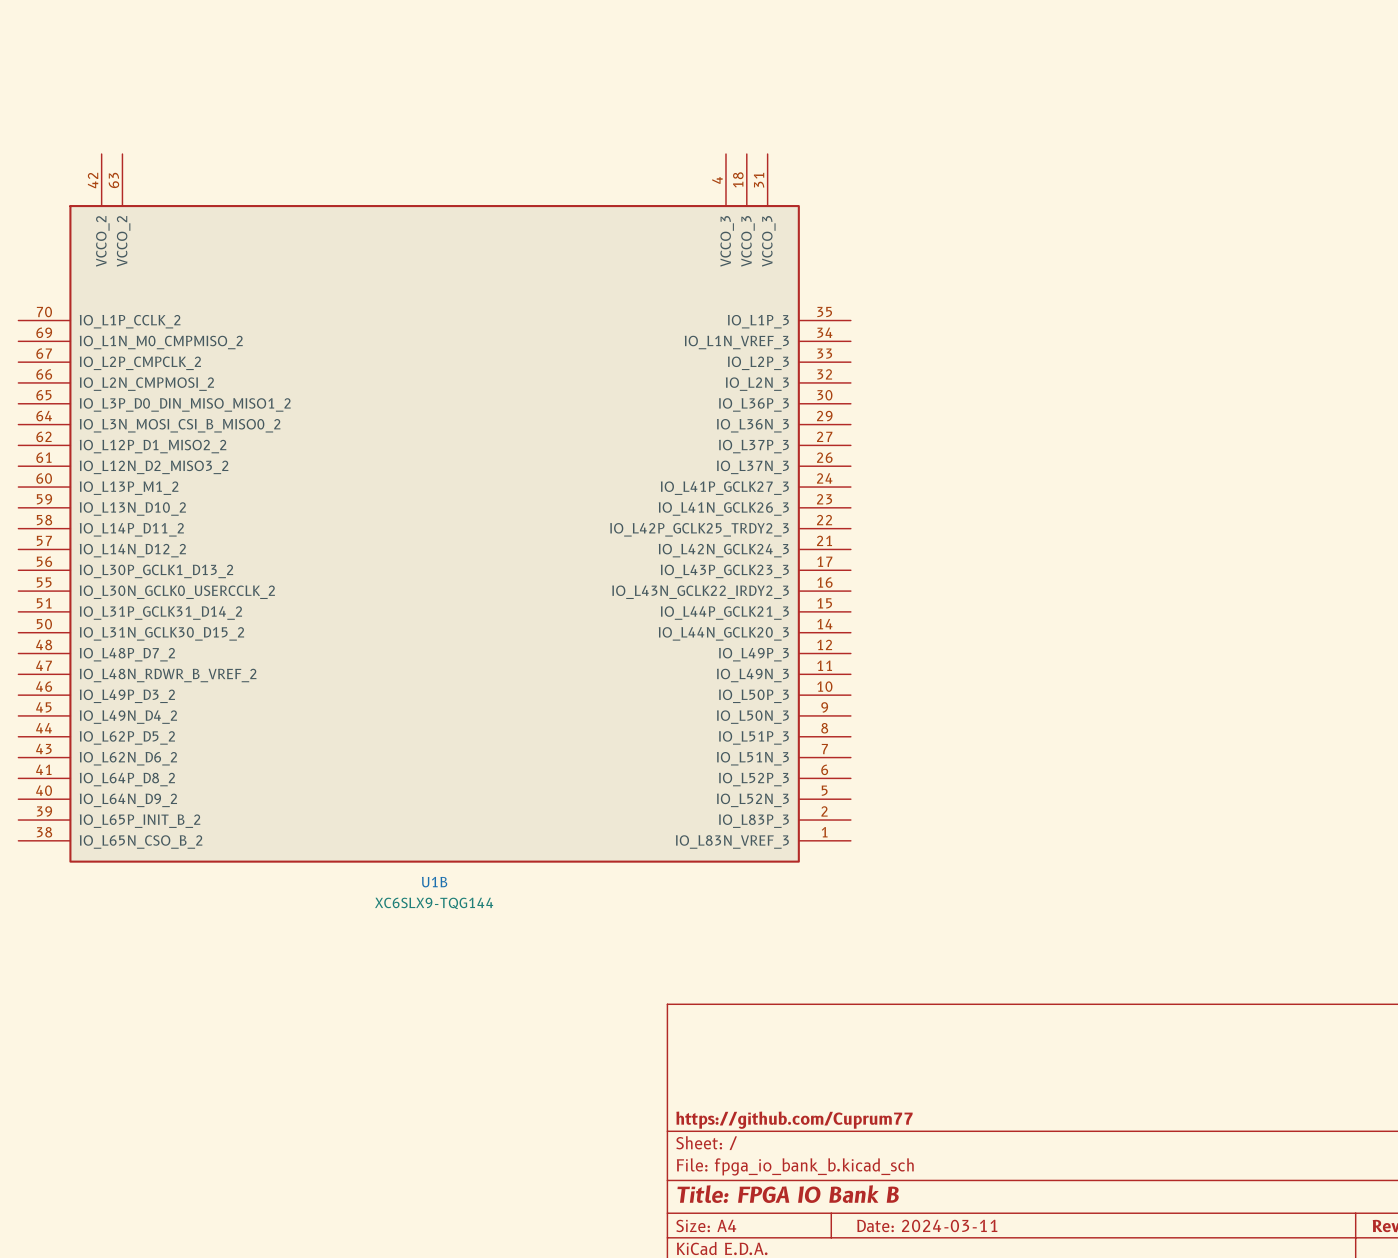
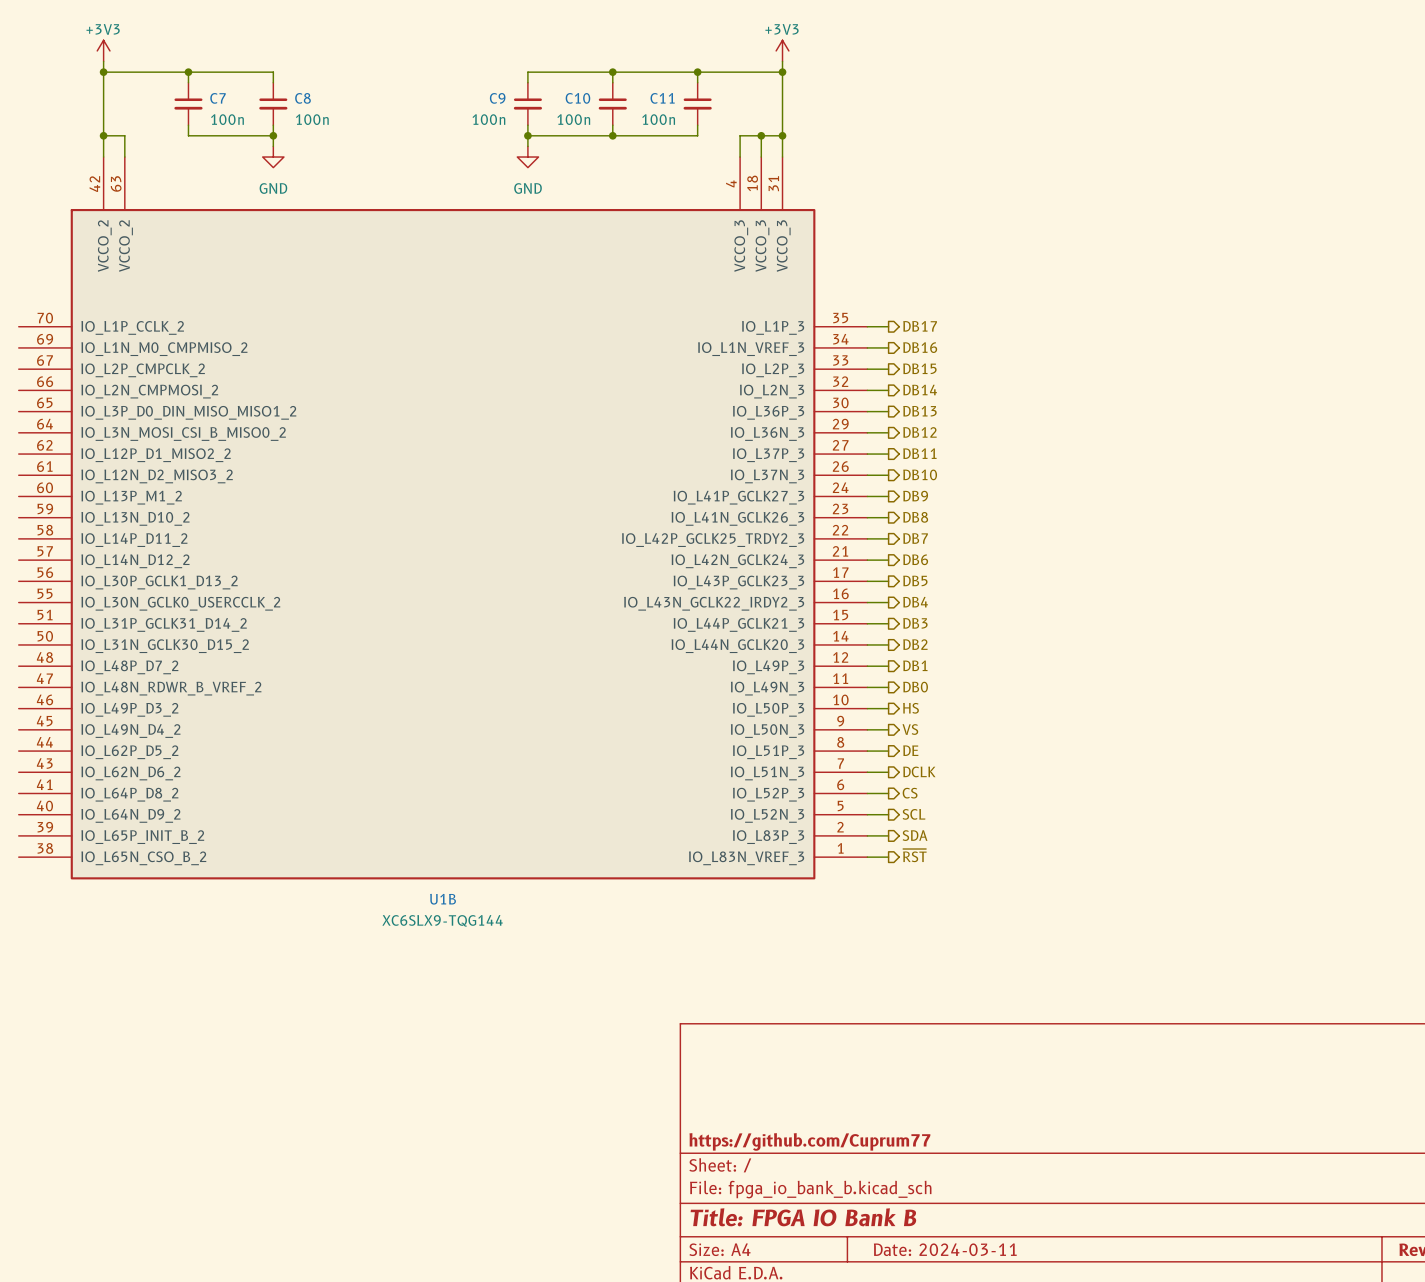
power symbol: none -> +3V3 (103, 50)
power symbol: none -> +3V3 (782, 50)
wire: none -> (103, 61) (103, 157)
wire: none -> (782, 61) (782, 157)
wire: none -> (103, 72) (273, 72) (273, 82)
junction: none -> (103, 72)
wire: none -> (188, 72) (188, 82)
junction: none -> (188, 72)
wire: none -> (612, 72) (612, 82)
junction: none -> (612, 72)
wire: none -> (697, 72) (697, 82)
junction: none -> (697, 72)
wire: none -> (782, 72) (527, 72) (527, 82)
junction: none -> (782, 72)
C7: none -> 100n (188, 103)
C8: none -> 100n (273, 103)
C9: none -> 100n (527, 103)
C10: none -> 100n (612, 103)
C11: none -> 100n (697, 103)
wire: none -> (188, 125) (188, 135) (273, 135)
wire: none -> (273, 125) (273, 146)
wire: none -> (527, 125) (527, 146)
wire: none -> (612, 125) (612, 135)
wire: none -> (697, 125) (697, 135) (527, 135)
wire: none -> (103, 135) (124, 135) (124, 157)
junction: none -> (103, 135)
junction: none -> (273, 135)
junction: none -> (527, 135)
junction: none -> (612, 135)
wire: none -> (761, 135) (761, 157)
junction: none -> (761, 135)
wire: none -> (782, 135) (740, 135) (740, 157)
junction: none -> (782, 135)
power symbol: none -> GND (273, 157)
power symbol: none -> GND (527, 157)
wire: none -> (867, 326) (888, 326)
hierarchical label: none -> DB17 (920, 326)
wire: none -> (867, 347) (888, 347)
hierarchical label: none -> DB16 (920, 347)
hierarchical label: none -> DB15 (919, 368)
wire: none -> (867, 369) (888, 369)
wire: none -> (867, 390) (888, 390)
hierarchical label: none -> DB14 (920, 389)
wire: none -> (867, 411) (888, 411)
hierarchical label: none -> DB13 (919, 411)
wire: none -> (867, 432) (888, 432)
hierarchical label: none -> DB12 (919, 432)
wire: none -> (867, 454) (888, 454)
hierarchical label: none -> DB11 (919, 453)
hierarchical label: none -> DB10 (920, 474)
wire: none -> (867, 475) (888, 475)
hierarchical label: none -> DB9 (915, 496)
wire: none -> (867, 496) (888, 496)
wire: none -> (867, 517) (888, 517)
hierarchical label: none -> DB8 (915, 517)
wire: none -> (867, 538) (888, 538)
hierarchical label: none -> DB7 (915, 538)
wire: none -> (867, 560) (888, 560)
hierarchical label: none -> DB6 (915, 559)
hierarchical label: none -> DB5 (915, 580)
wire: none -> (867, 581) (888, 581)
hierarchical label: none -> DB4 (915, 602)
wire: none -> (867, 602) (888, 602)
wire: none -> (867, 623) (888, 623)
hierarchical label: none -> DB3 (915, 623)
wire: none -> (867, 644) (888, 644)
hierarchical label: none -> DB2 (915, 644)
wire: none -> (867, 666) (888, 666)
hierarchical label: none -> DB1 (915, 665)
wire: none -> (867, 687) (888, 687)
hierarchical label: none -> DB0 (915, 687)
hierarchical label: none -> HS (911, 708)
wire: none -> (867, 708) (888, 708)
wire: none -> (867, 729) (888, 729)
hierarchical label: none -> VS (910, 729)
wire: none -> (867, 751) (888, 751)
hierarchical label: none -> DE (910, 750)
wire: none -> (867, 772) (888, 772)
hierarchical label: none -> DCLK (919, 771)
wire: none -> (867, 793) (888, 793)
hierarchical label: none -> CS (910, 793)
hierarchical label: none -> SCL (914, 814)
wire: none -> (867, 814) (888, 814)
hierarchical label: none -> SDA (915, 835)
wire: none -> (867, 835) (888, 835)
hierarchical label: none -> ~{RST} (914, 855)
wire: none -> (867, 857) (888, 857)

